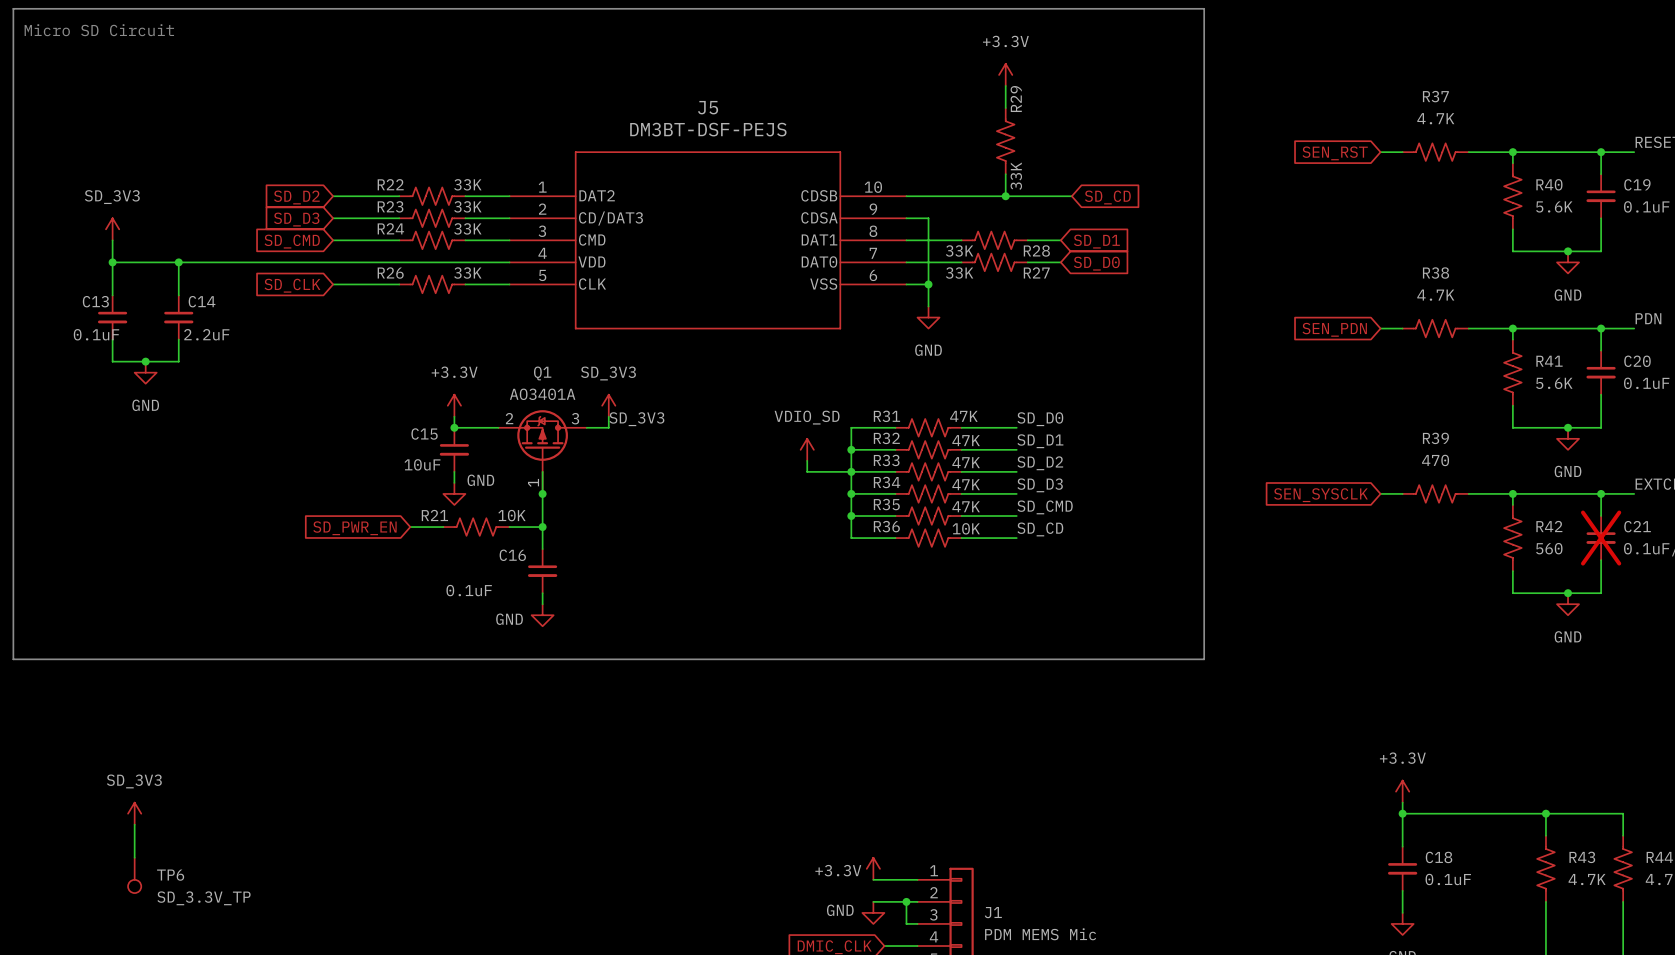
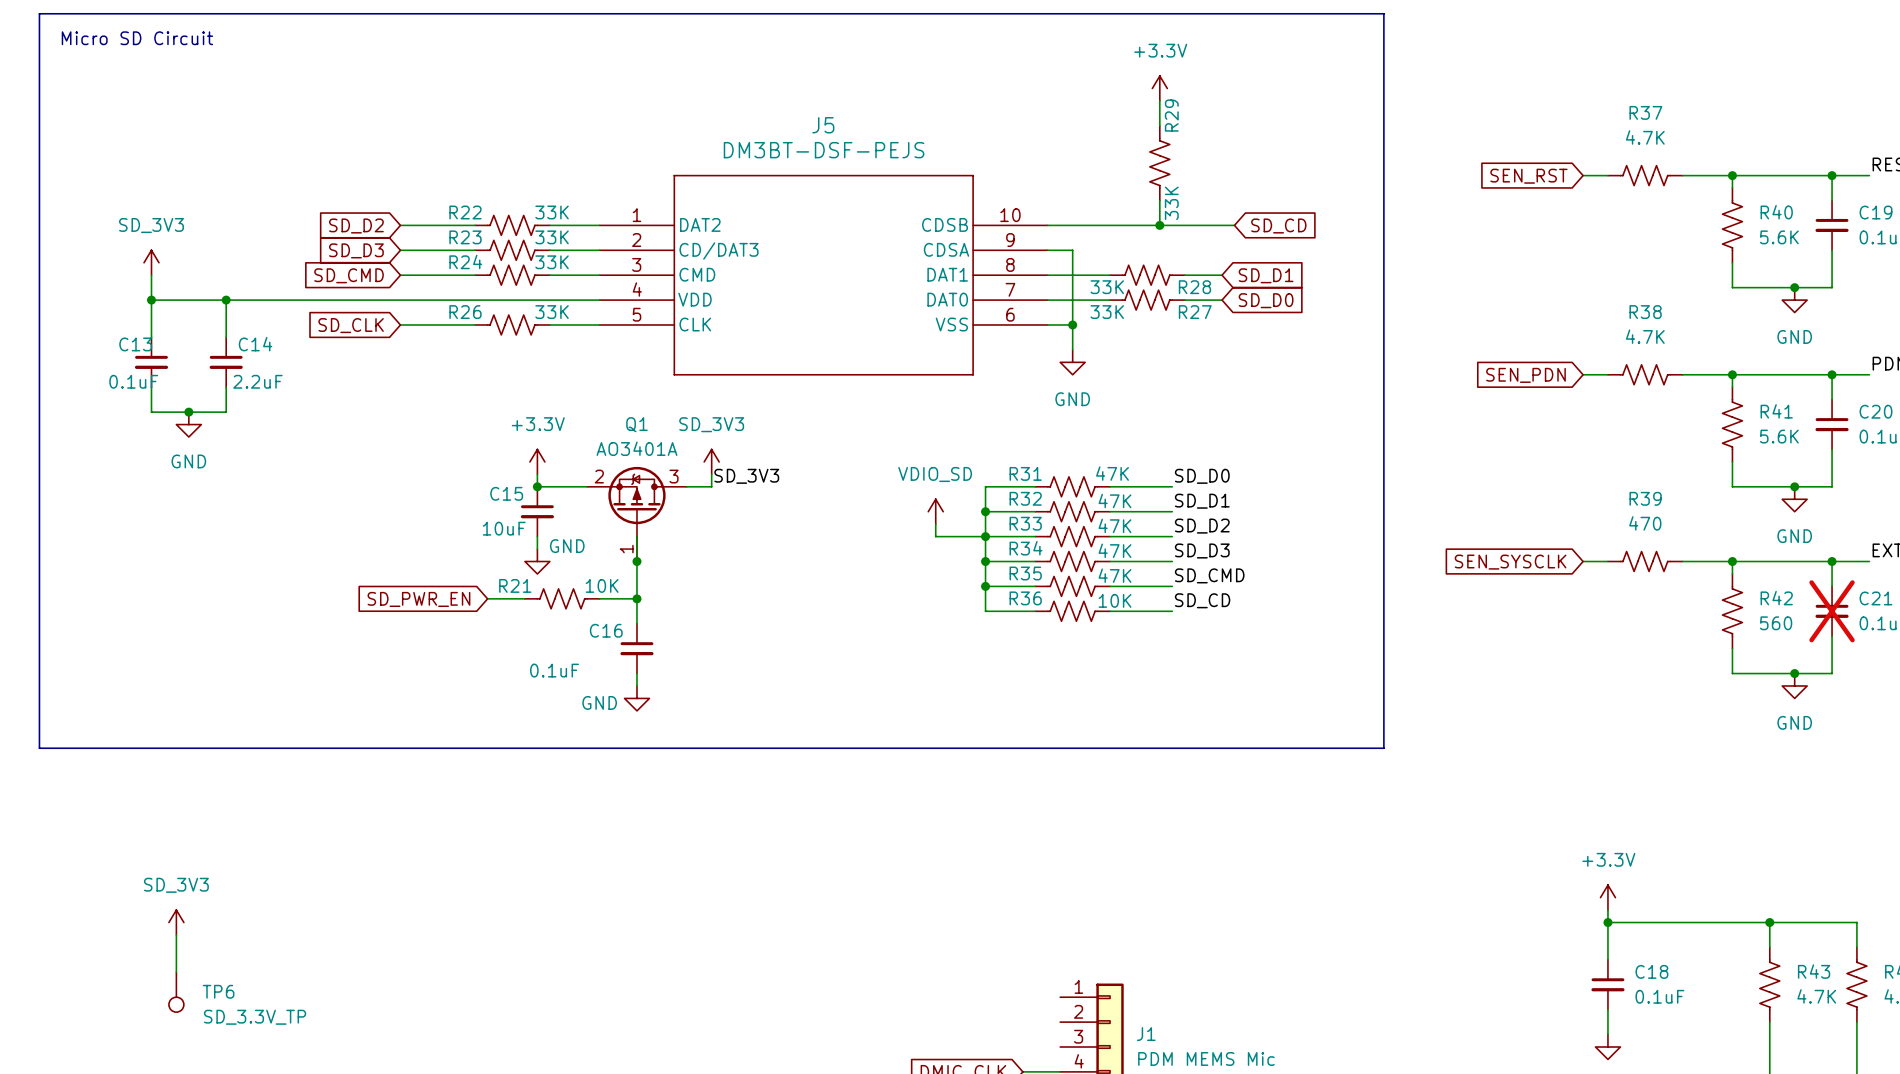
power symbol: +3.3V (873, 868) -> none
wire: (873, 879) (917, 879) -> none
wire: (873, 901) (917, 901) -> none
wire: (906, 901) (906, 923) (917, 923) -> none
junction: (906, 901) -> none
power symbol: GND (873, 912) -> none

